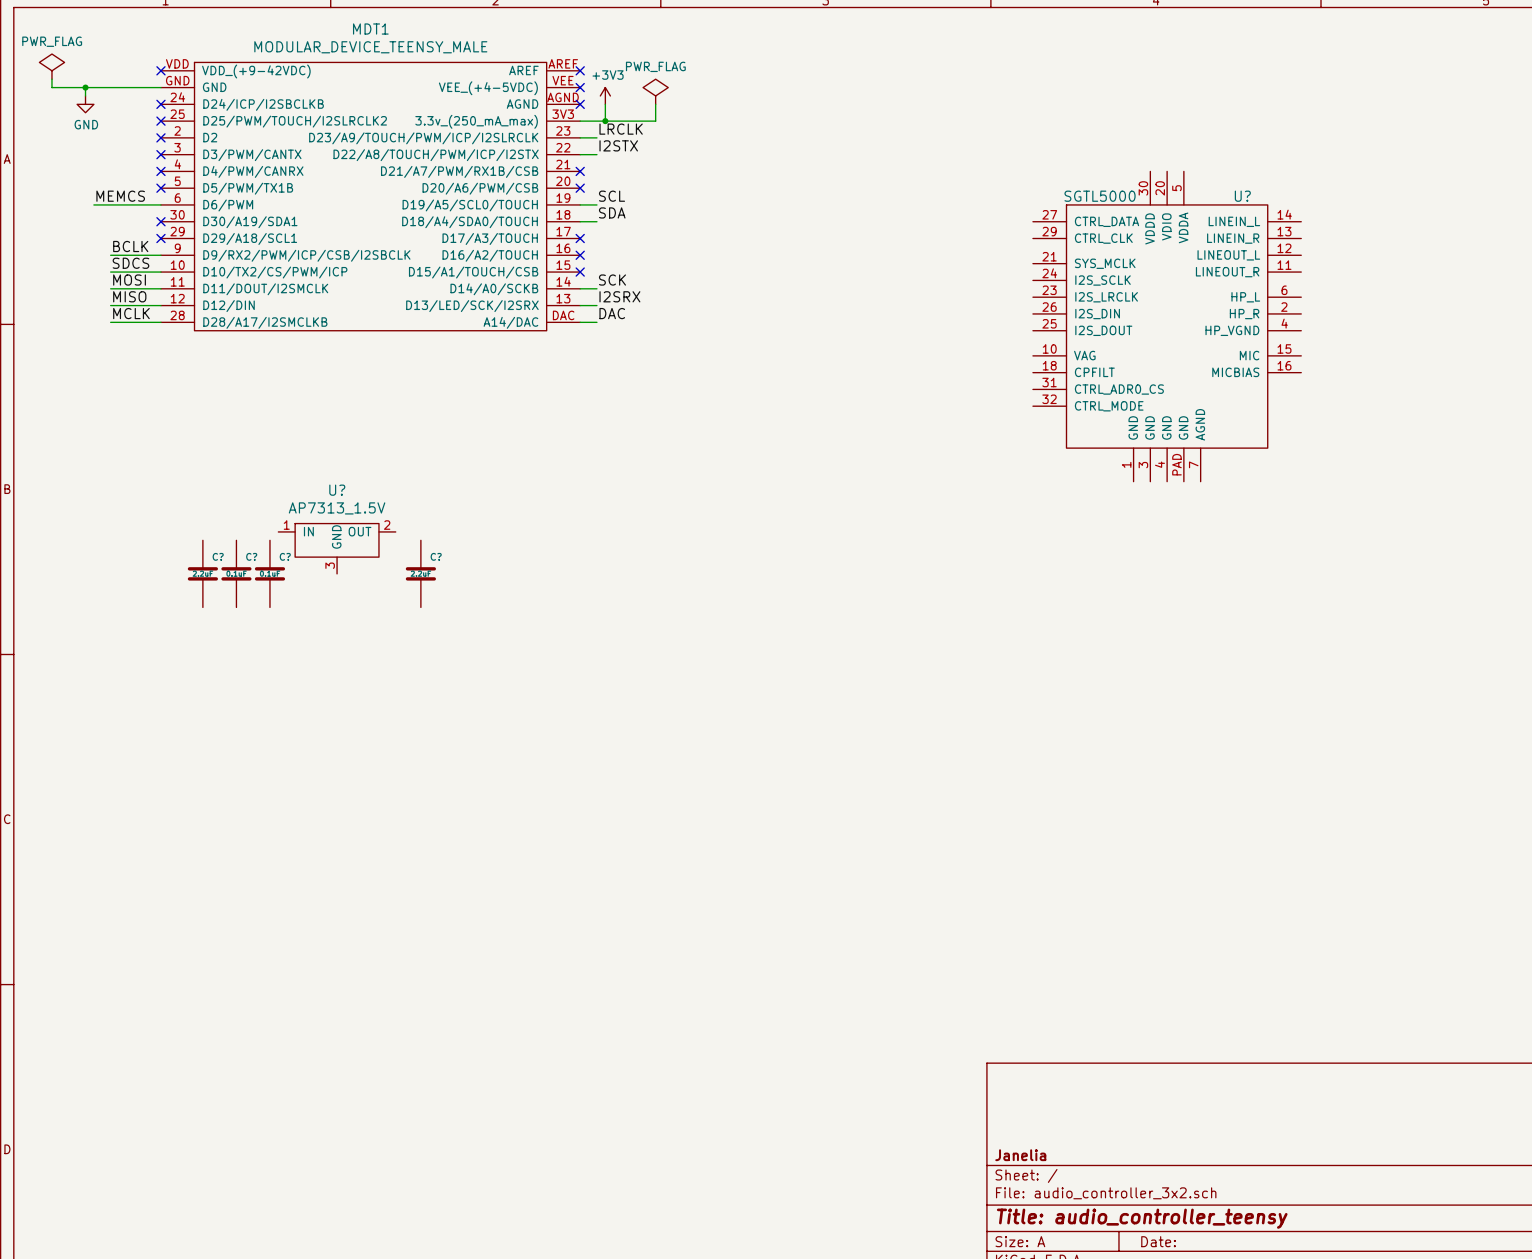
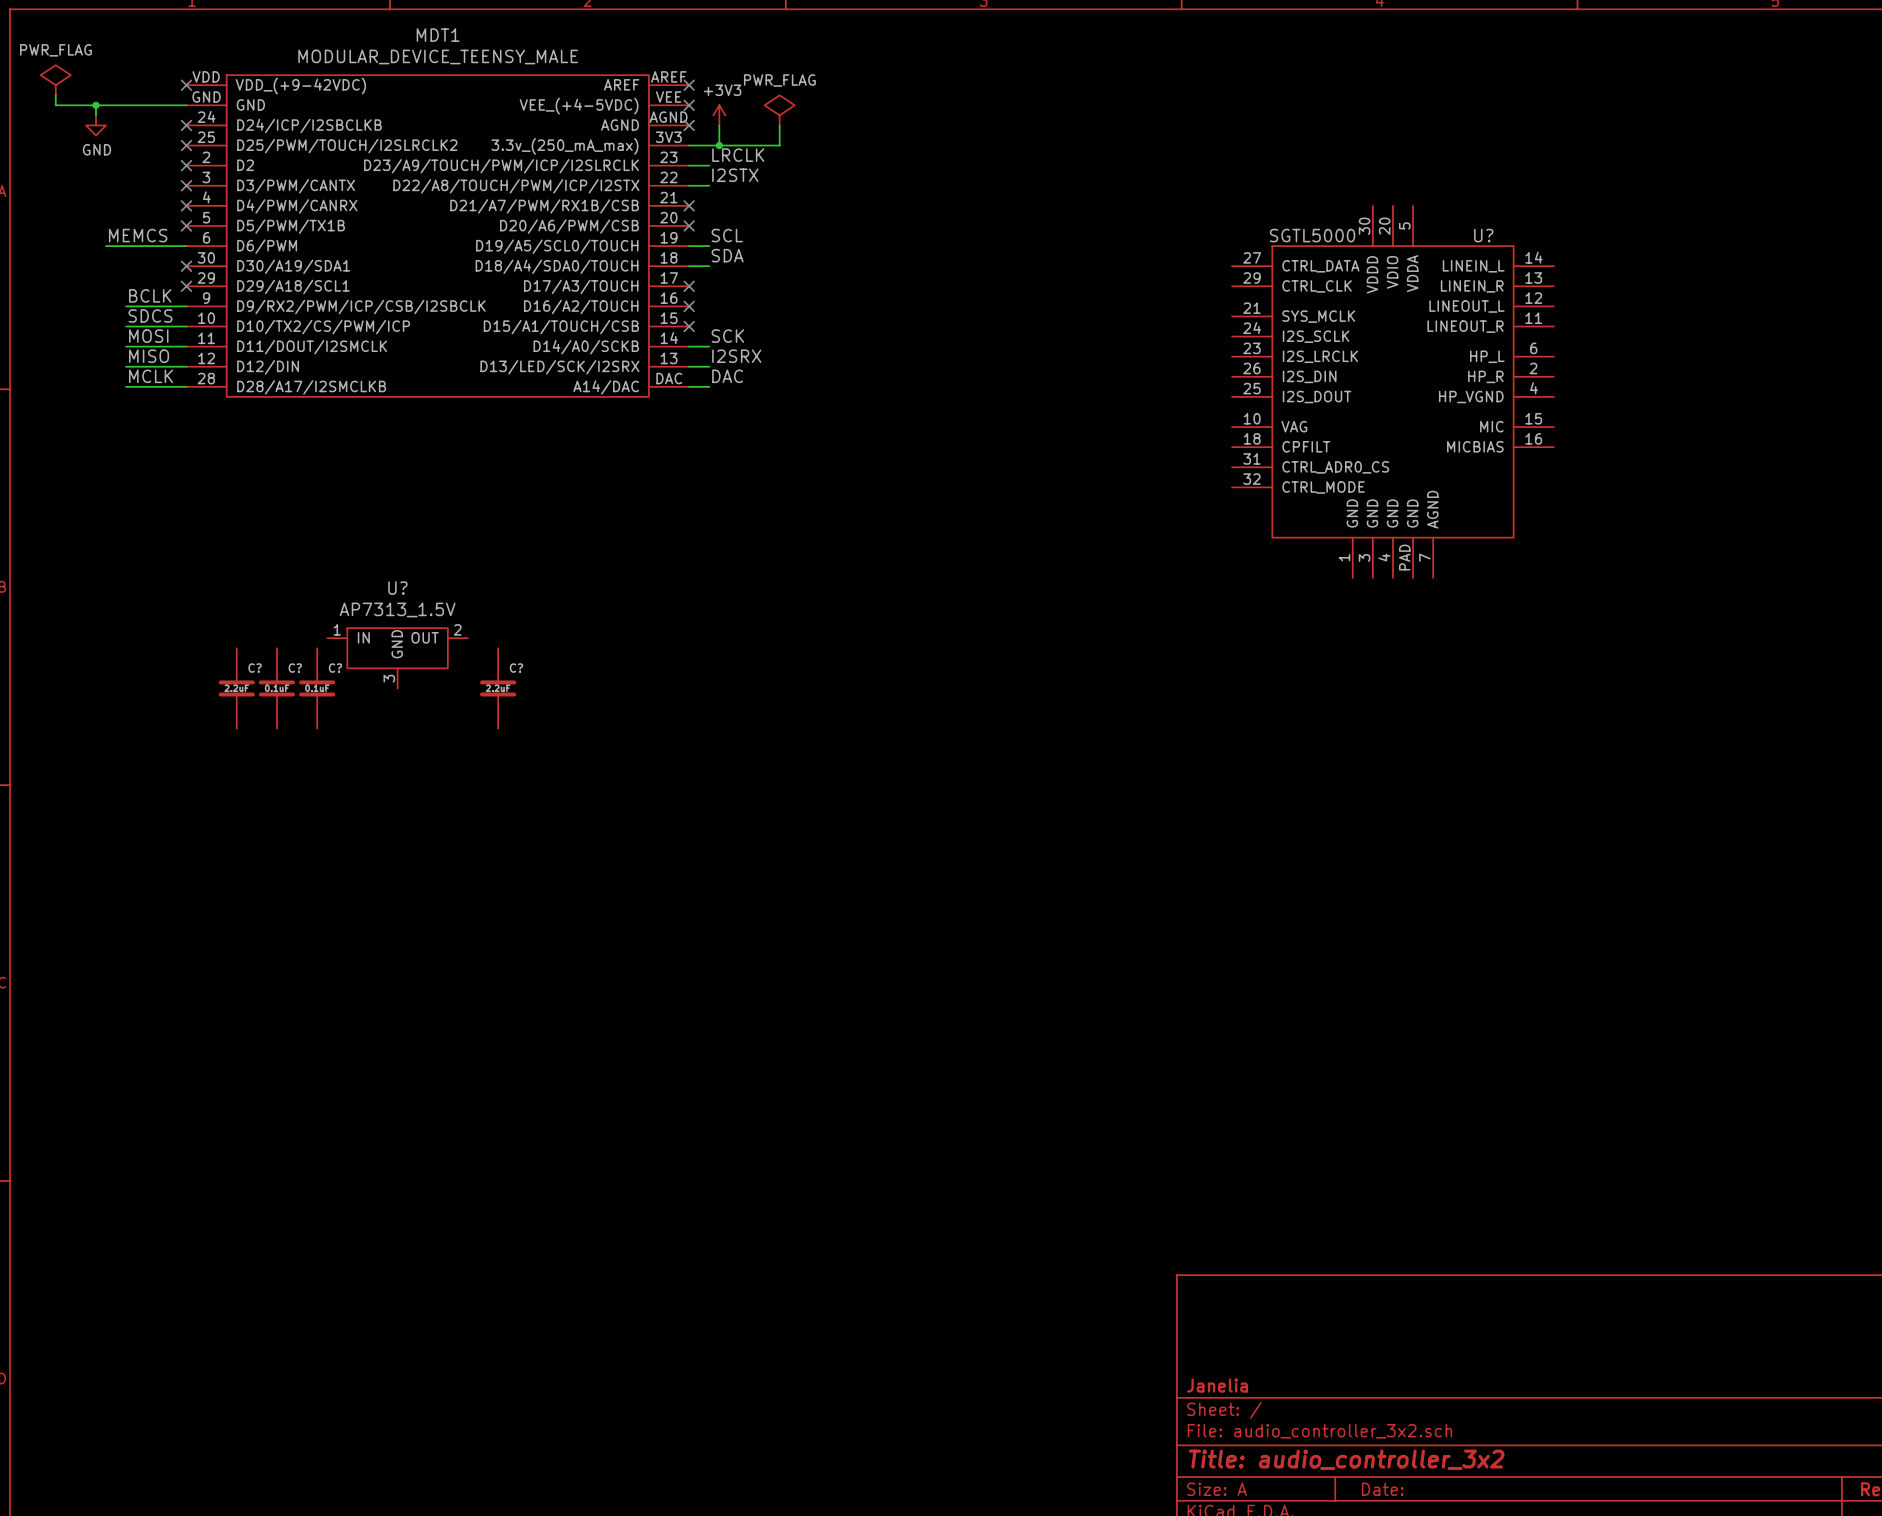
title block: Title: audio_controller_teensy (1142, 1218) -> Title: audio_controller_3x2 (1346, 1459)

